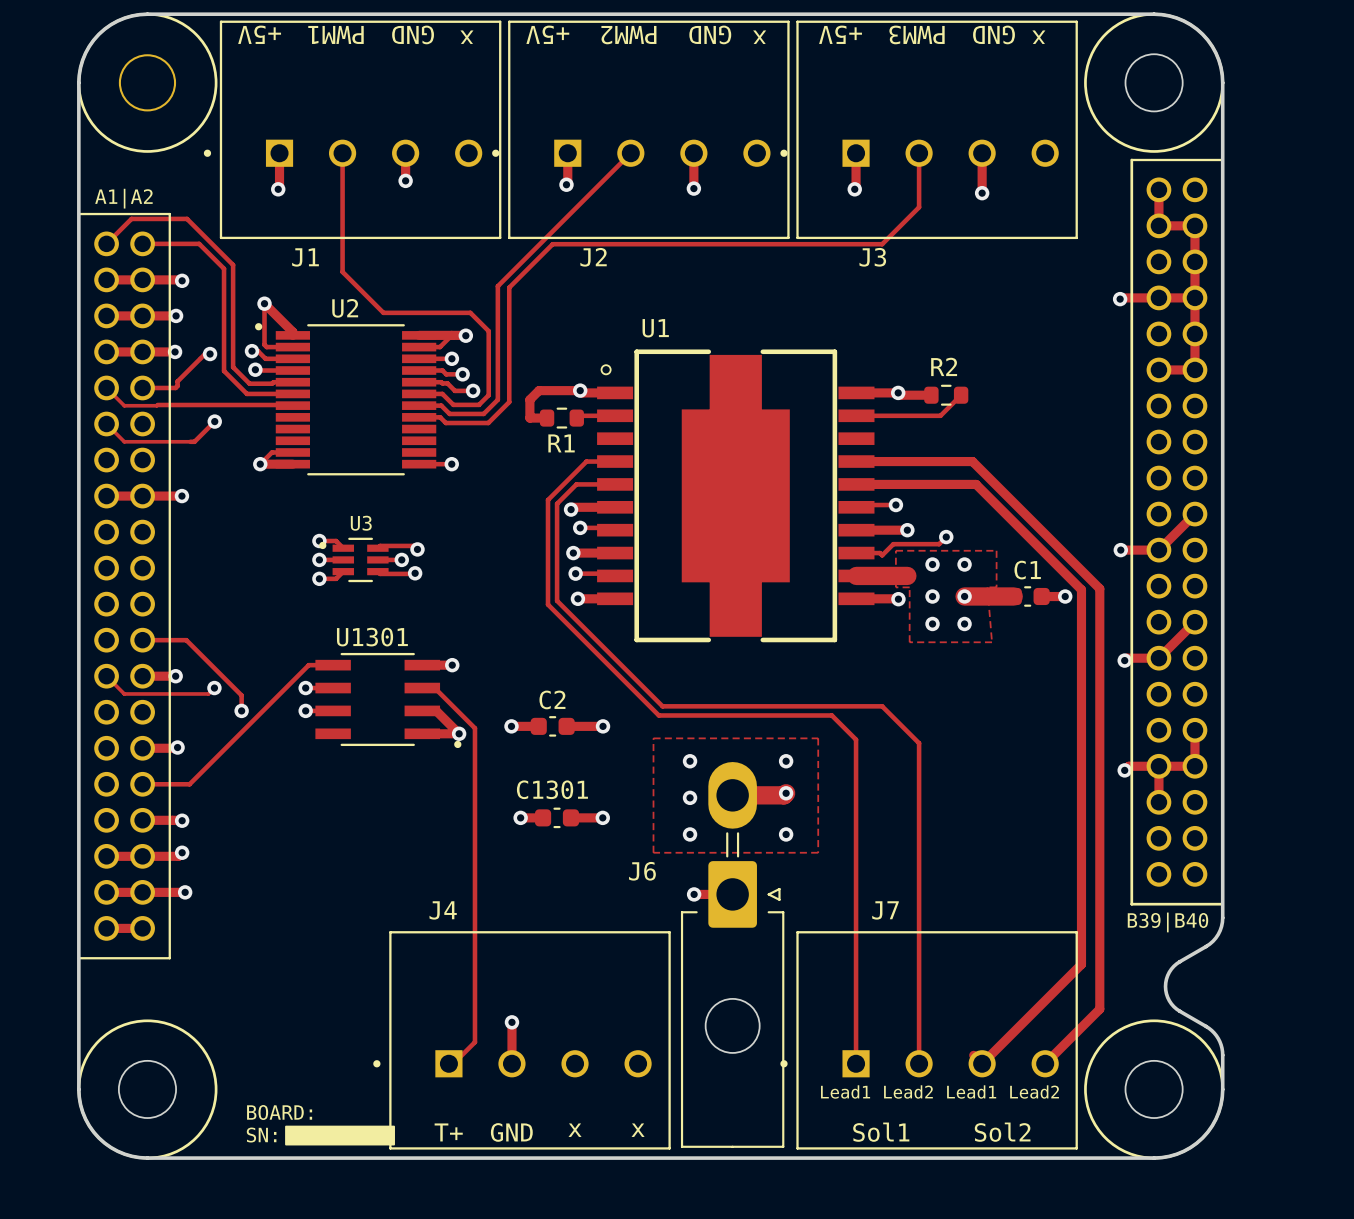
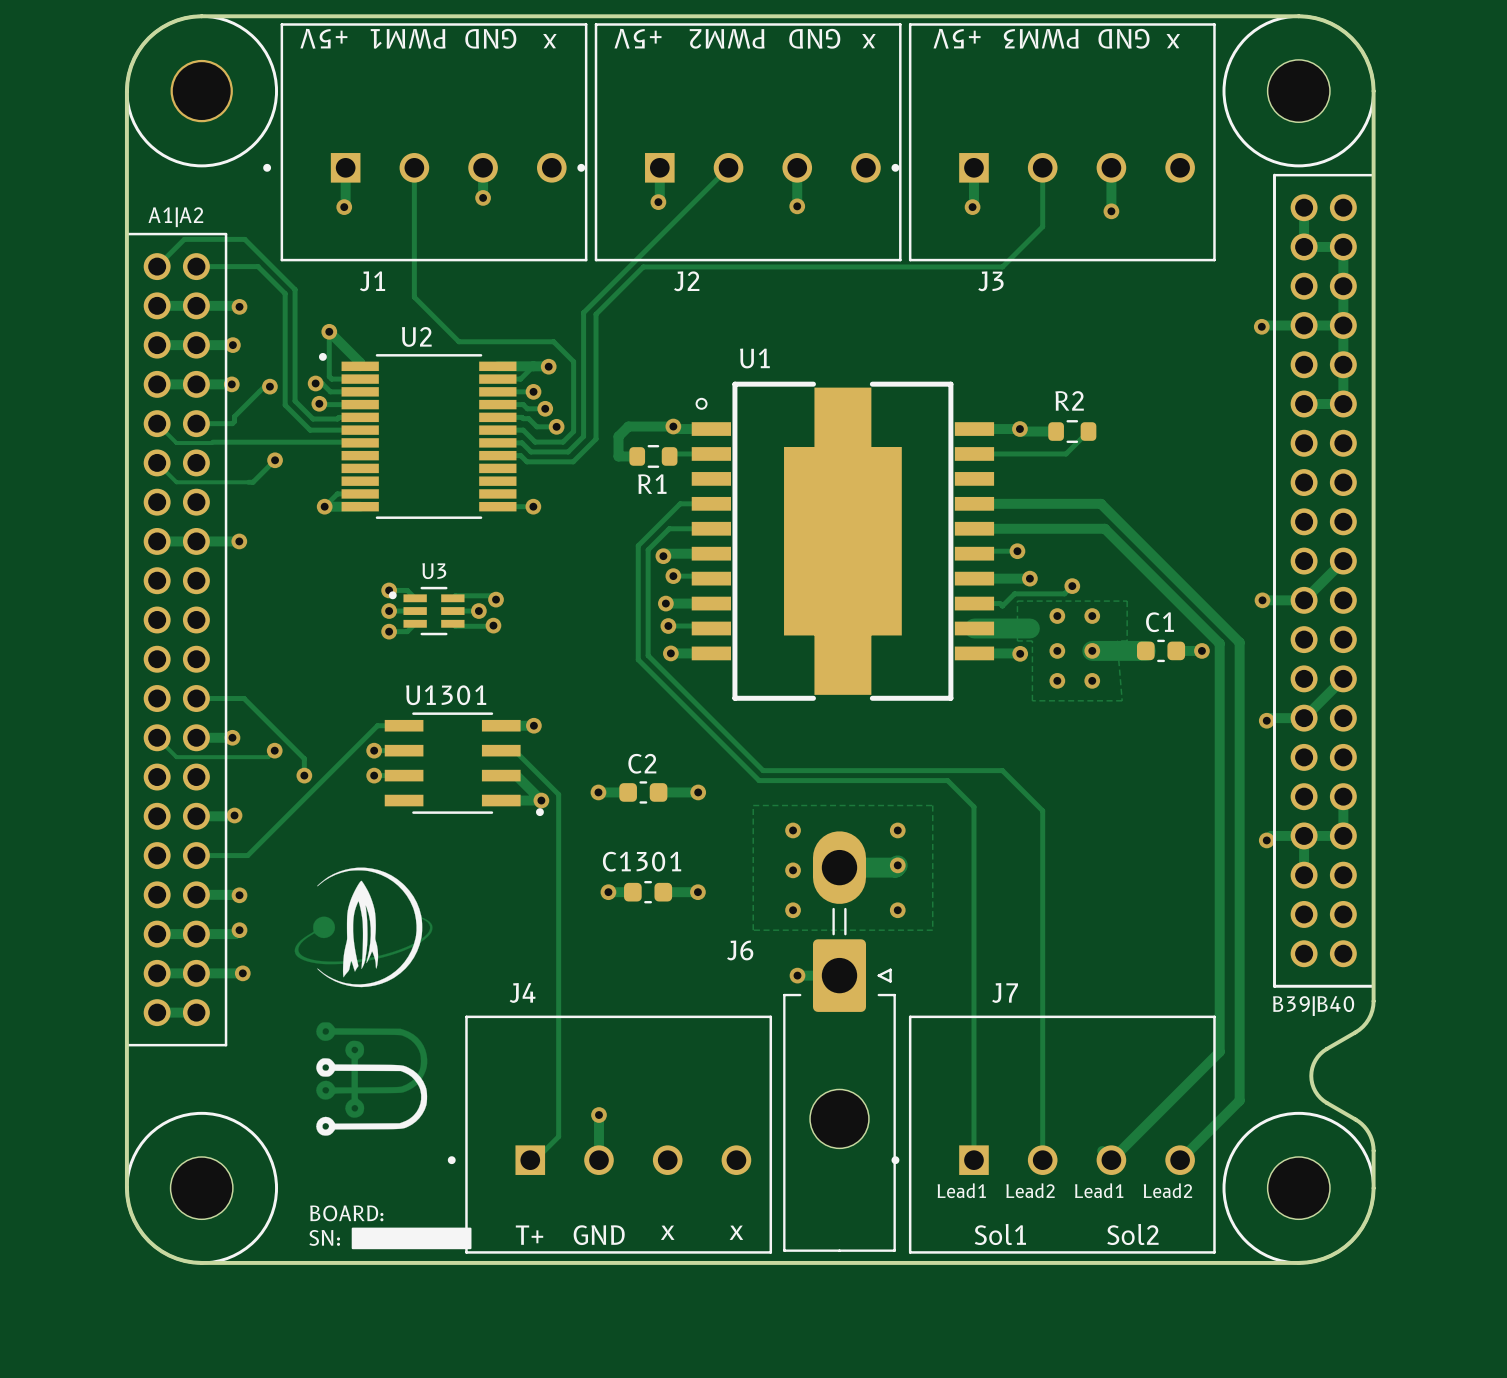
drawing: none -> [294, 867, 433, 988]
drawing: none -> [316, 1022, 428, 1136]

